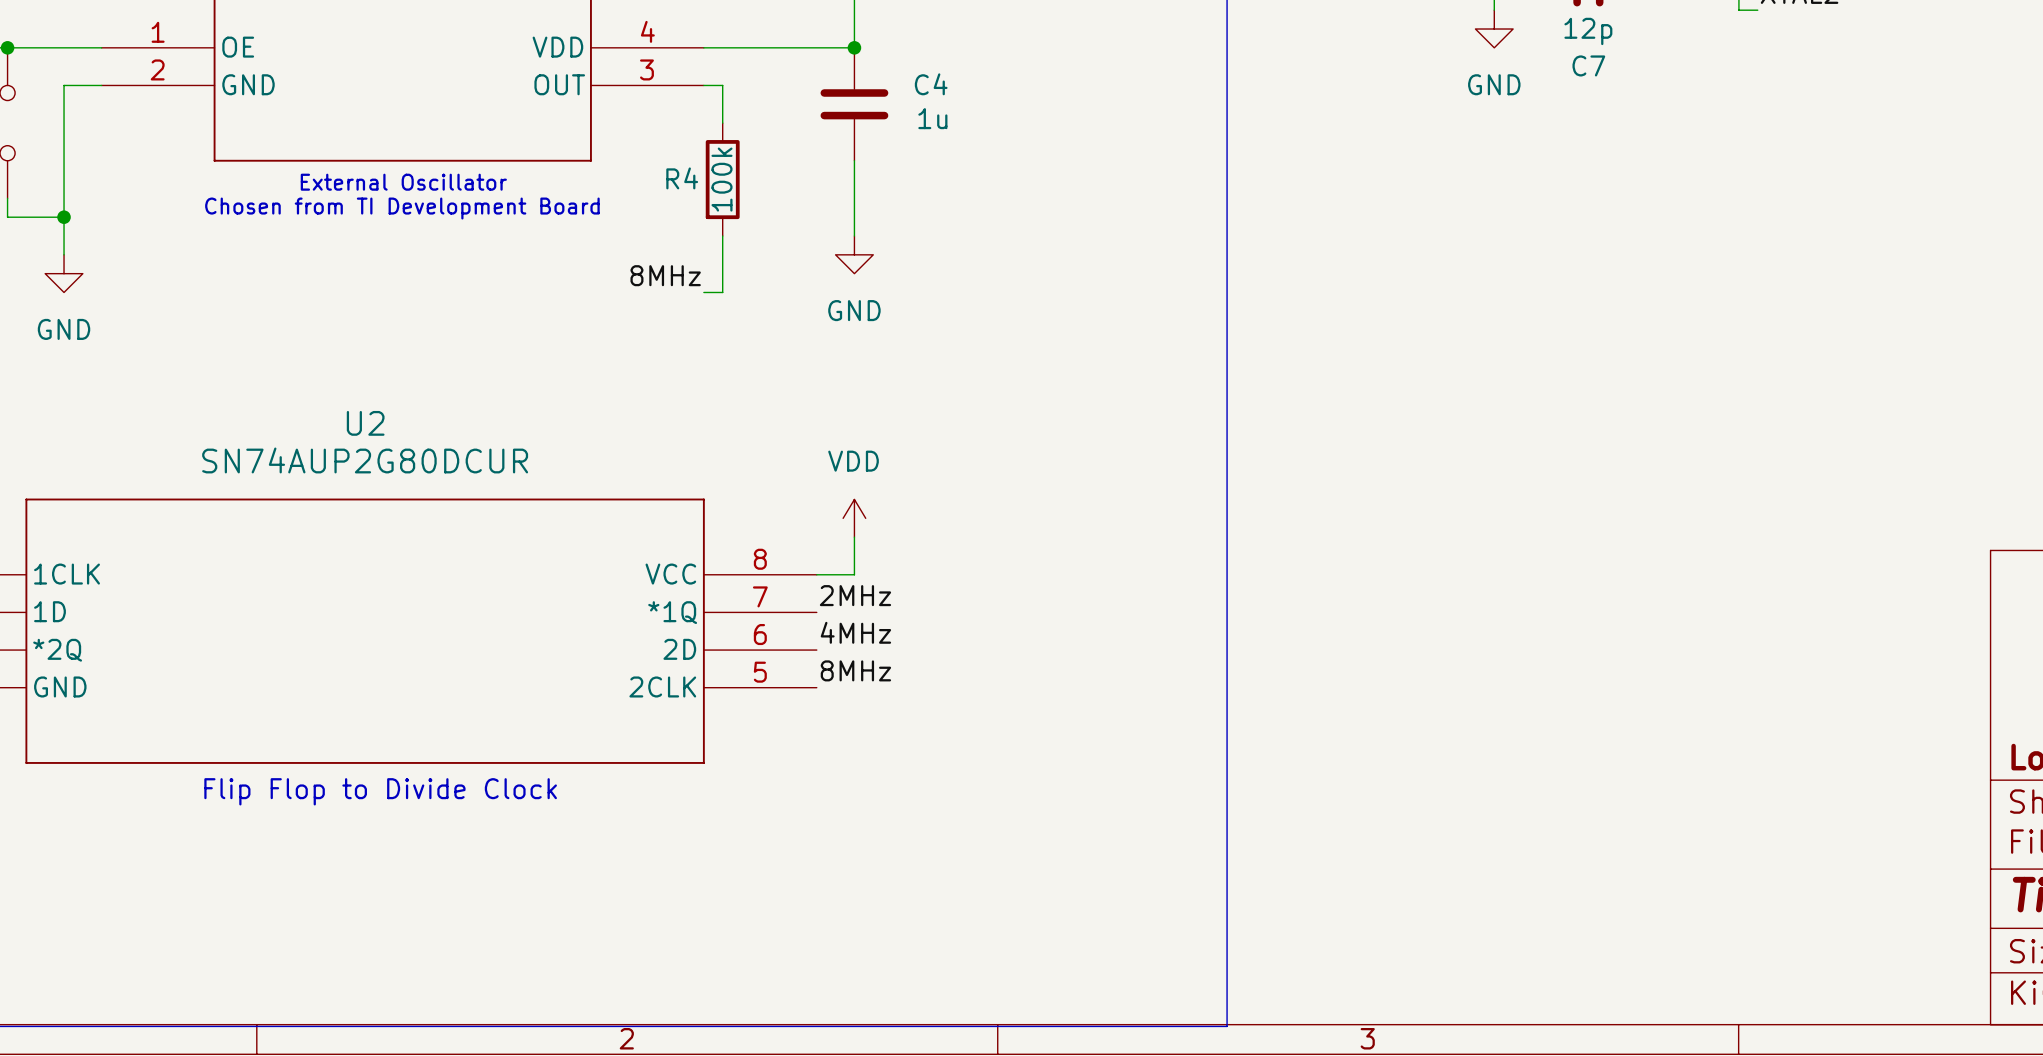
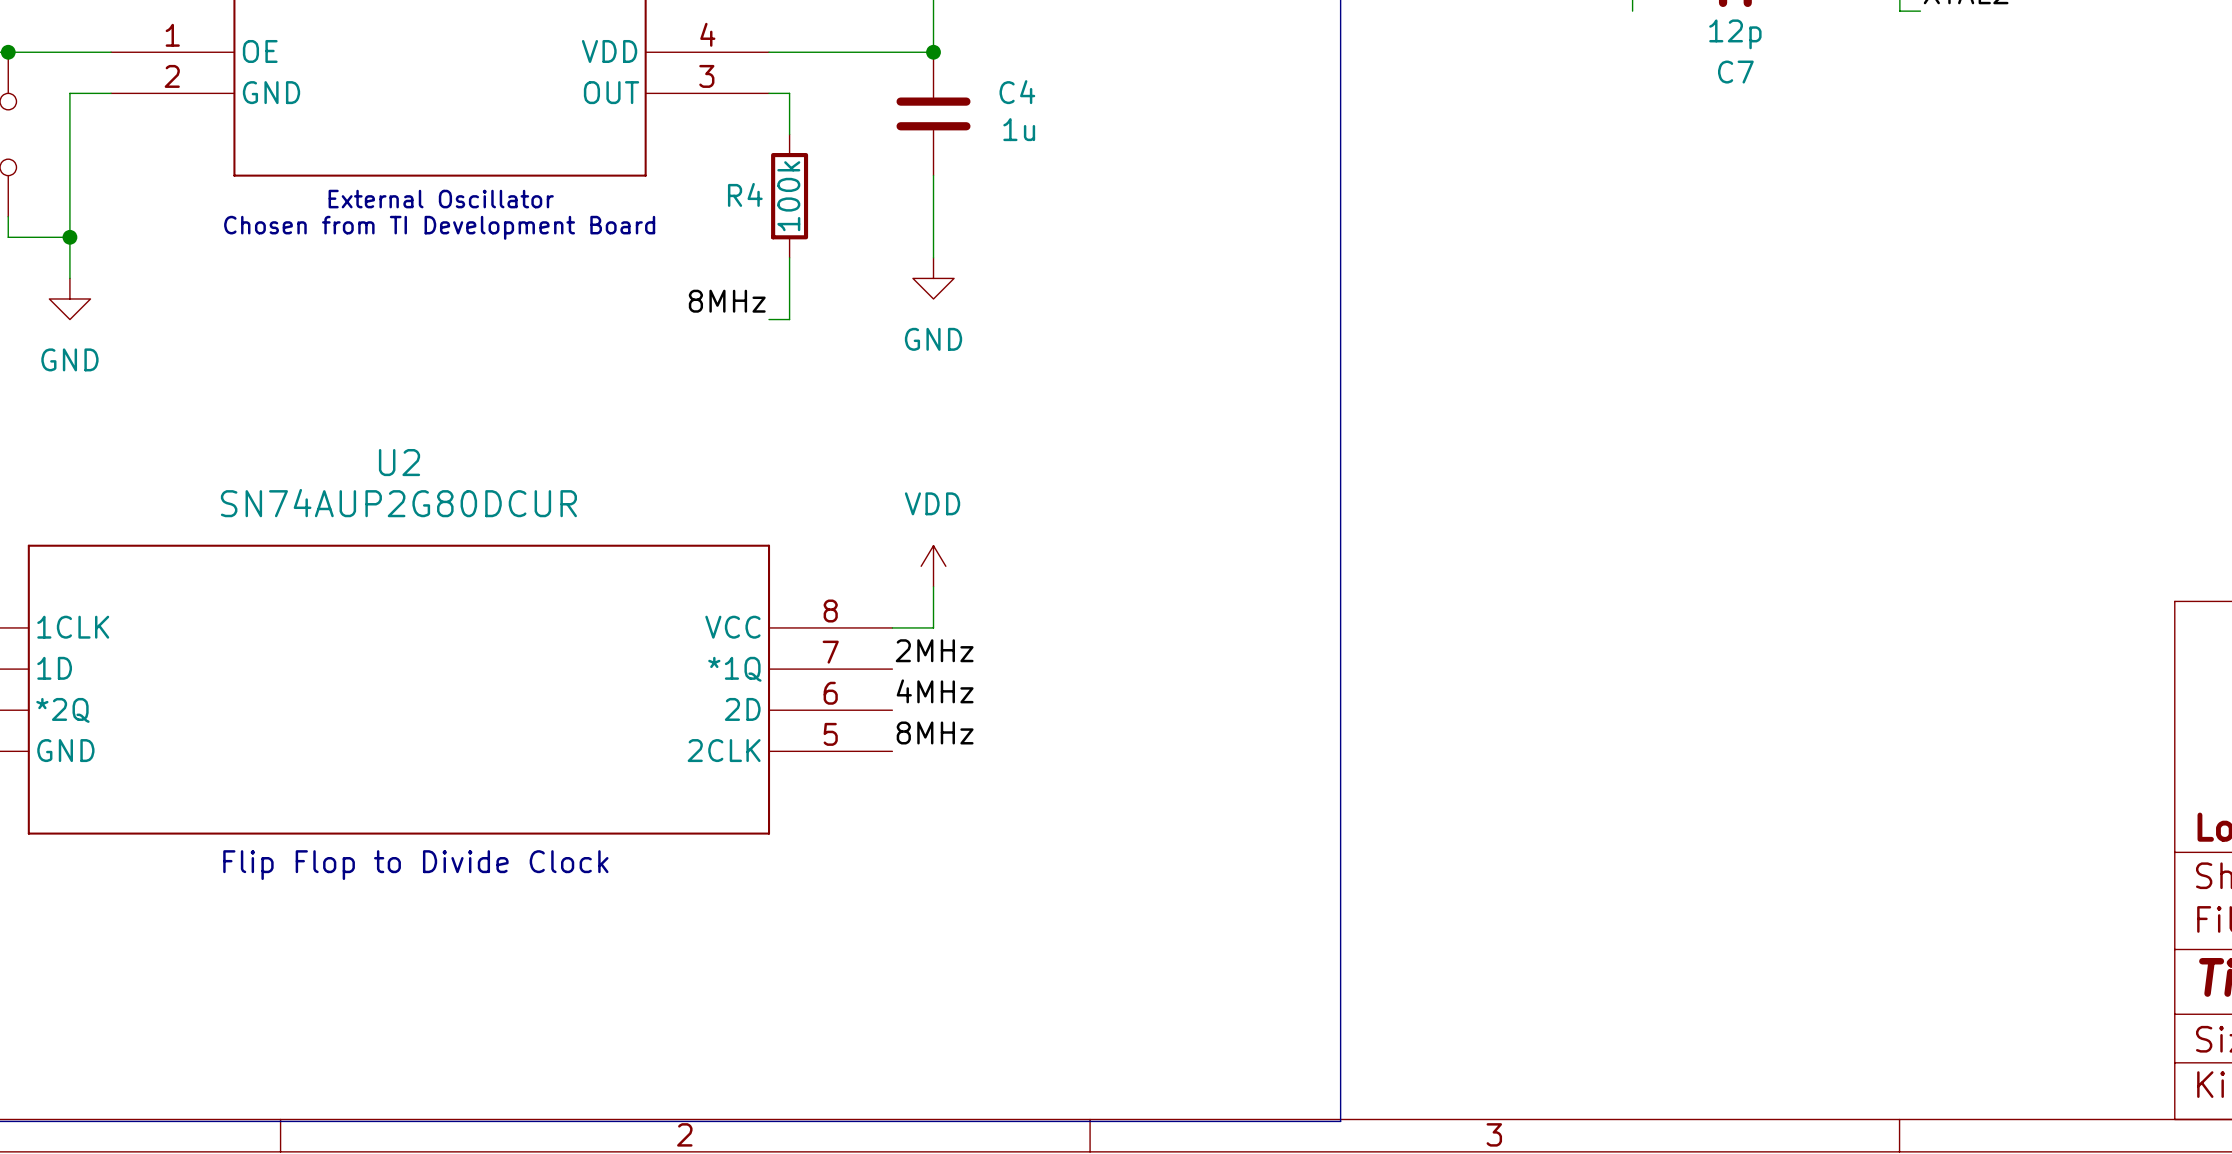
power symbol: GND (1494, 29) -> none

